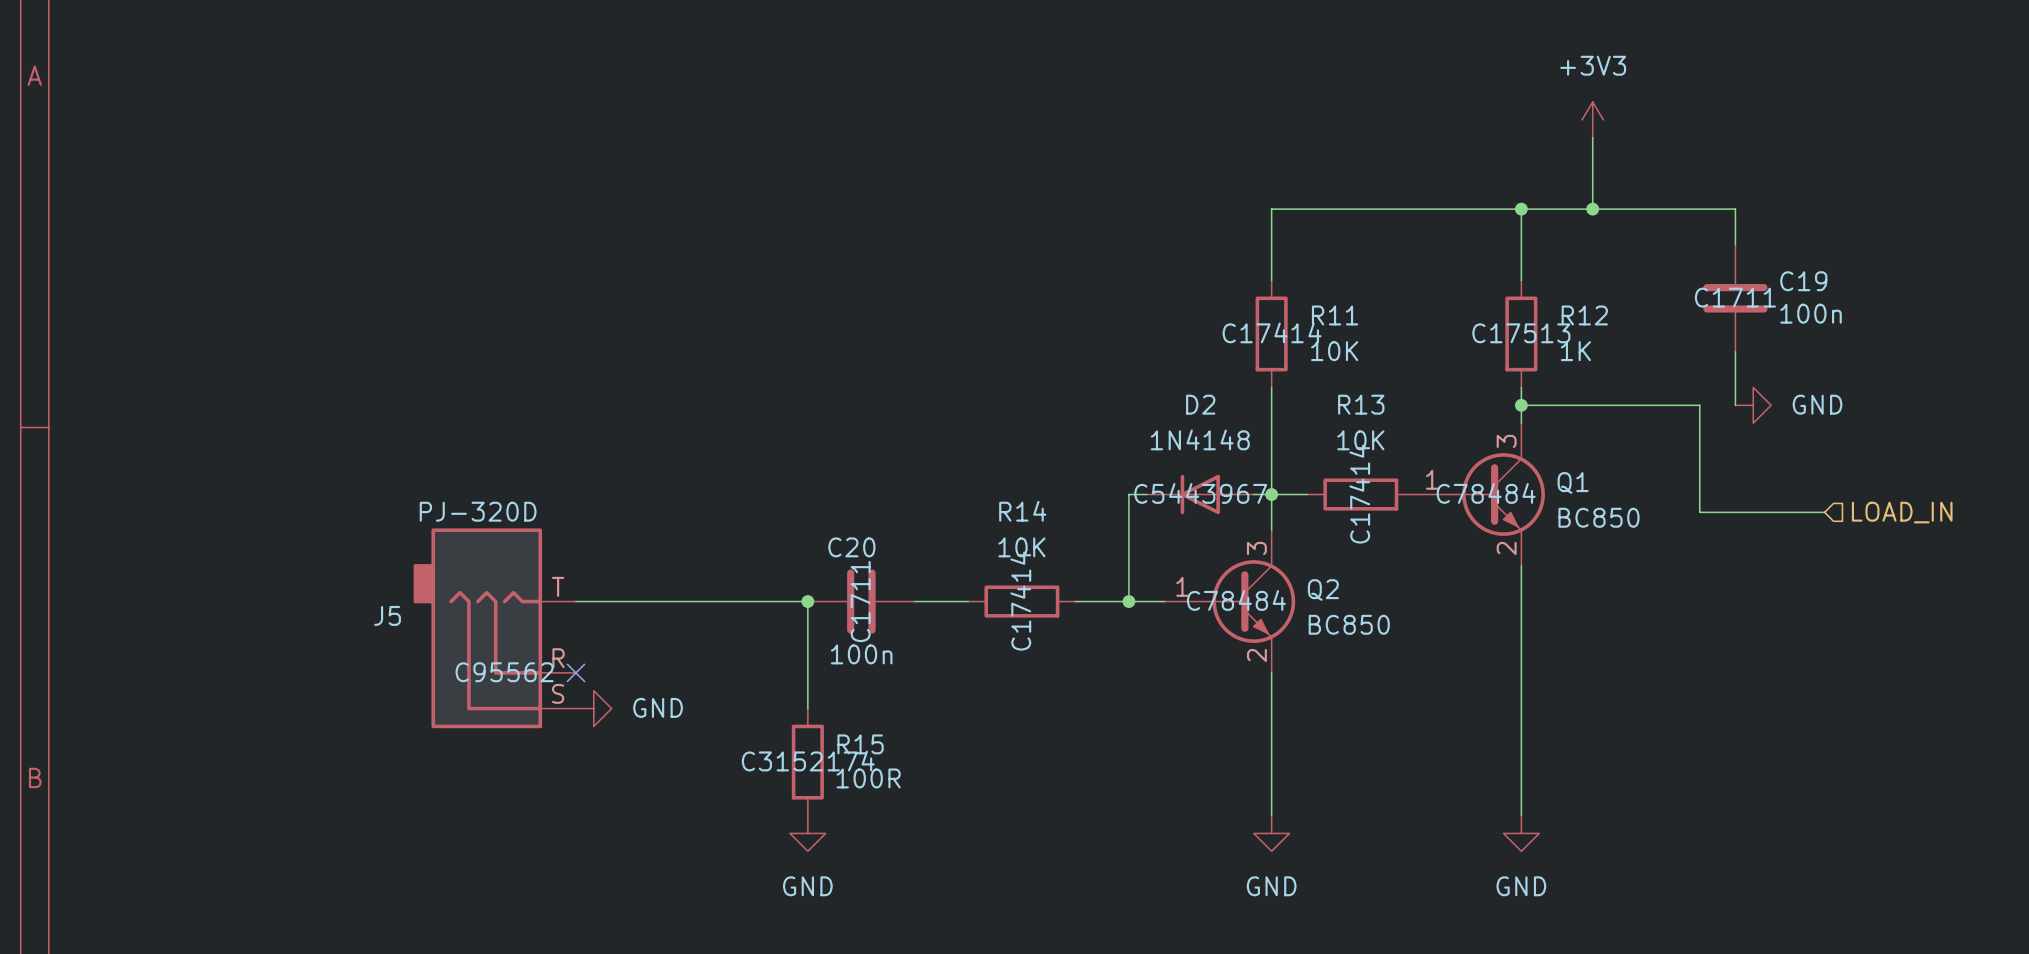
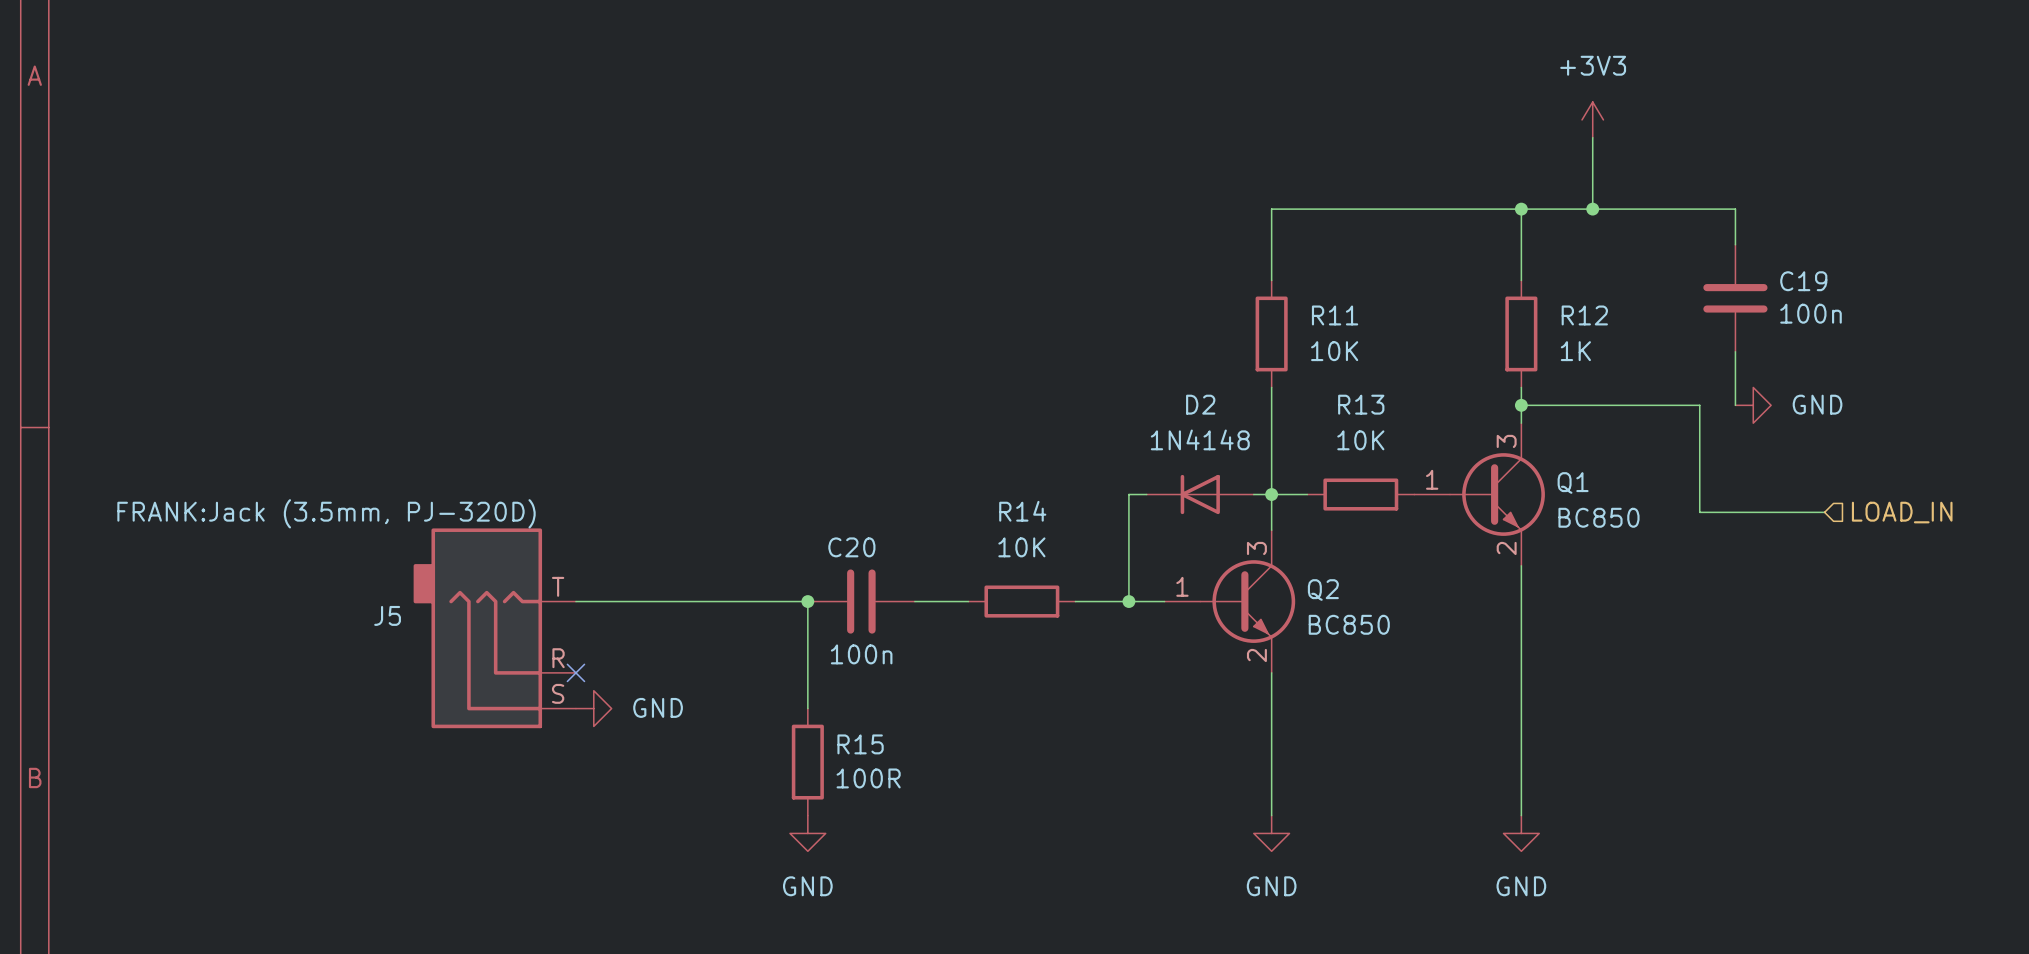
C19 text: C1711 (1735, 297) -> none
R11 text: C17414 (1272, 332) -> none
R12 text: C17513 (1521, 333) -> none
D2 text: C5443967 (1200, 493) -> none
Q1 text: C78484 (1486, 493) -> none
R13 text: C17414 (1359, 494) -> none
J5 value: PJ-320D (478, 511) -> FRANK:Jack (3.5mm, PJ-320D) (326, 513)
Q2 text: C78484 (1236, 600) -> none
C20 text: C1711 (860, 601) -> none
R14 text: C17414 (1020, 601) -> none
J5 text: C95562 (504, 672) -> none
R15 text: C3152174 (808, 761) -> none

